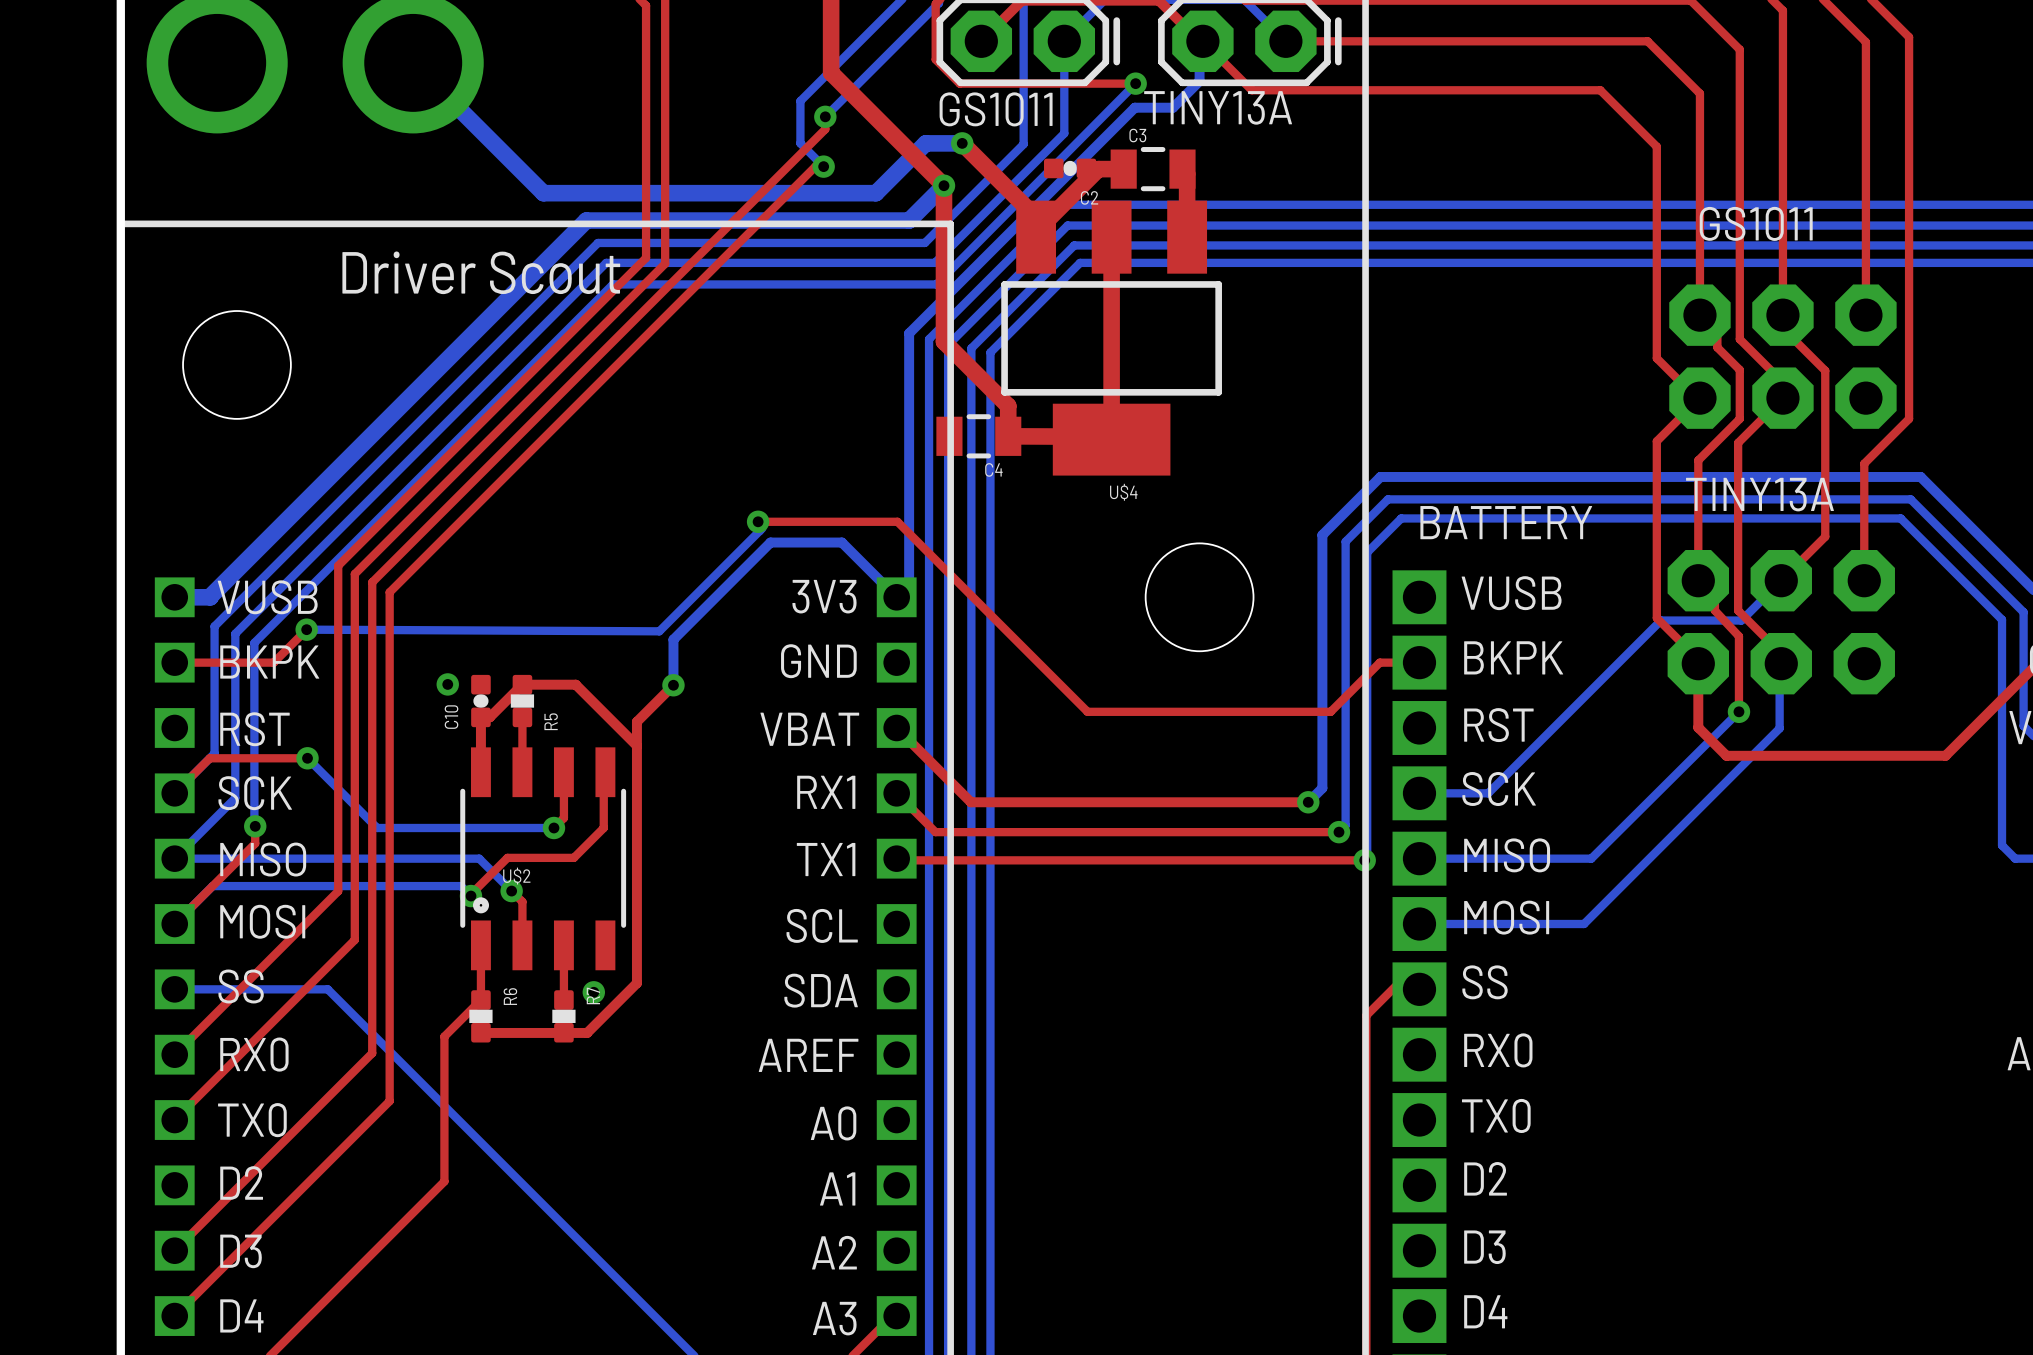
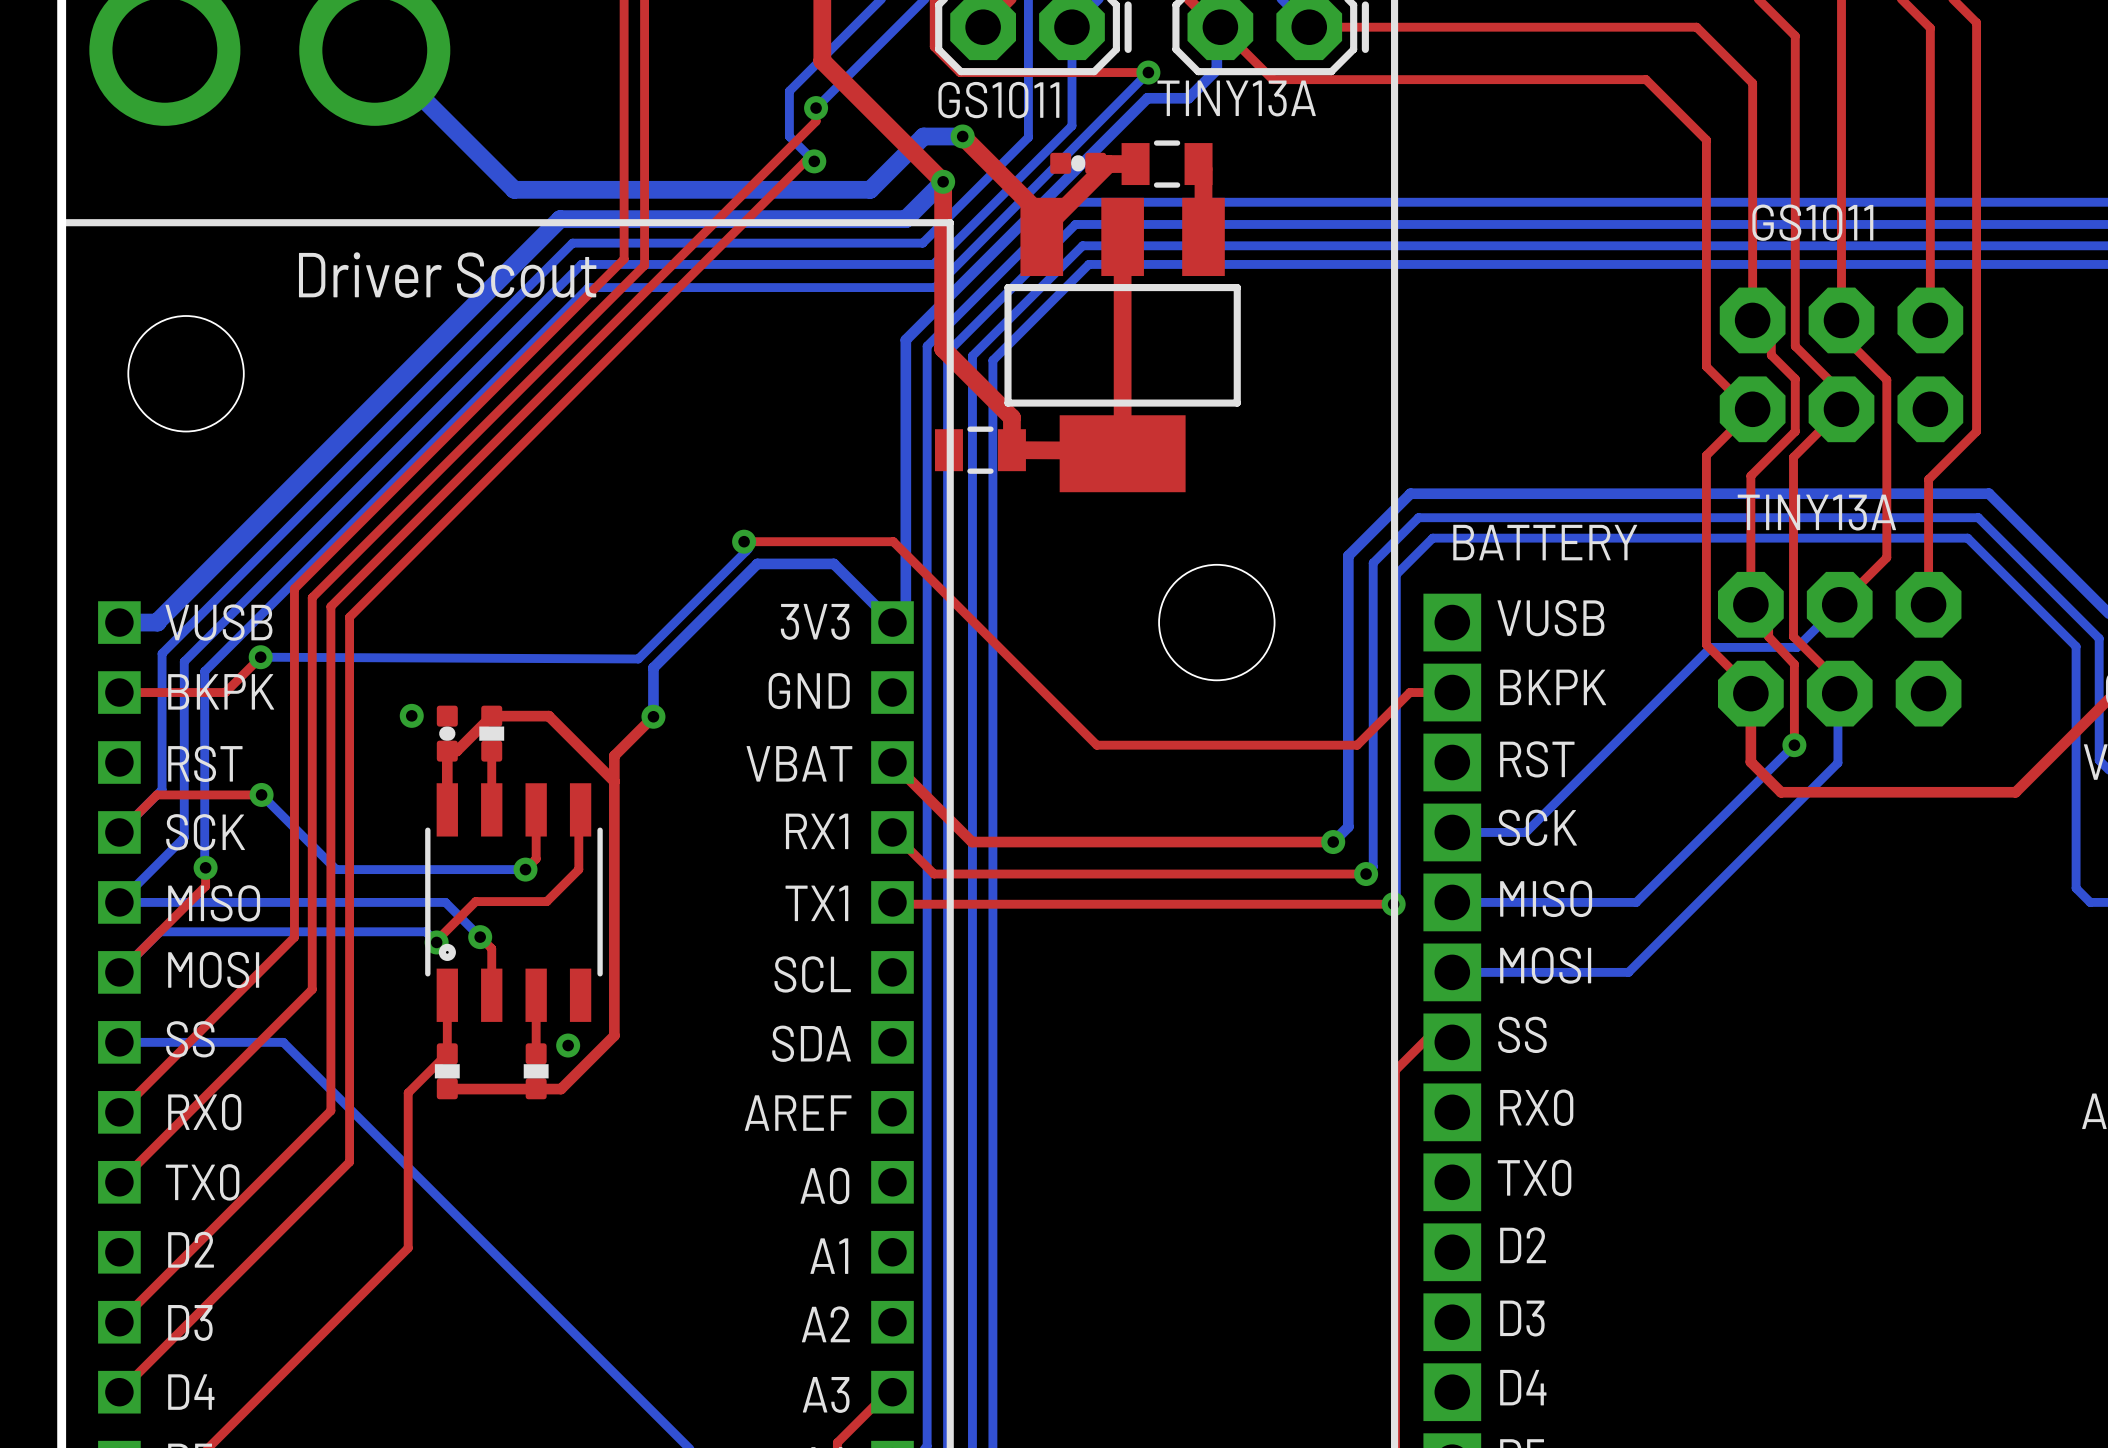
C3 name: C3 (1137, 135) -> none
C2 name: C2 (1089, 197) -> none
C4 name: C4 (993, 469) -> none
U$4 name: U$4 (1123, 492) -> none
C10 name: C10 (451, 717) -> none
R5 name: R5 (551, 721) -> none
U$2 name: U$2 (516, 876) -> none
R7 name: R7 (593, 995) -> none
R6 name: R6 (510, 996) -> none

